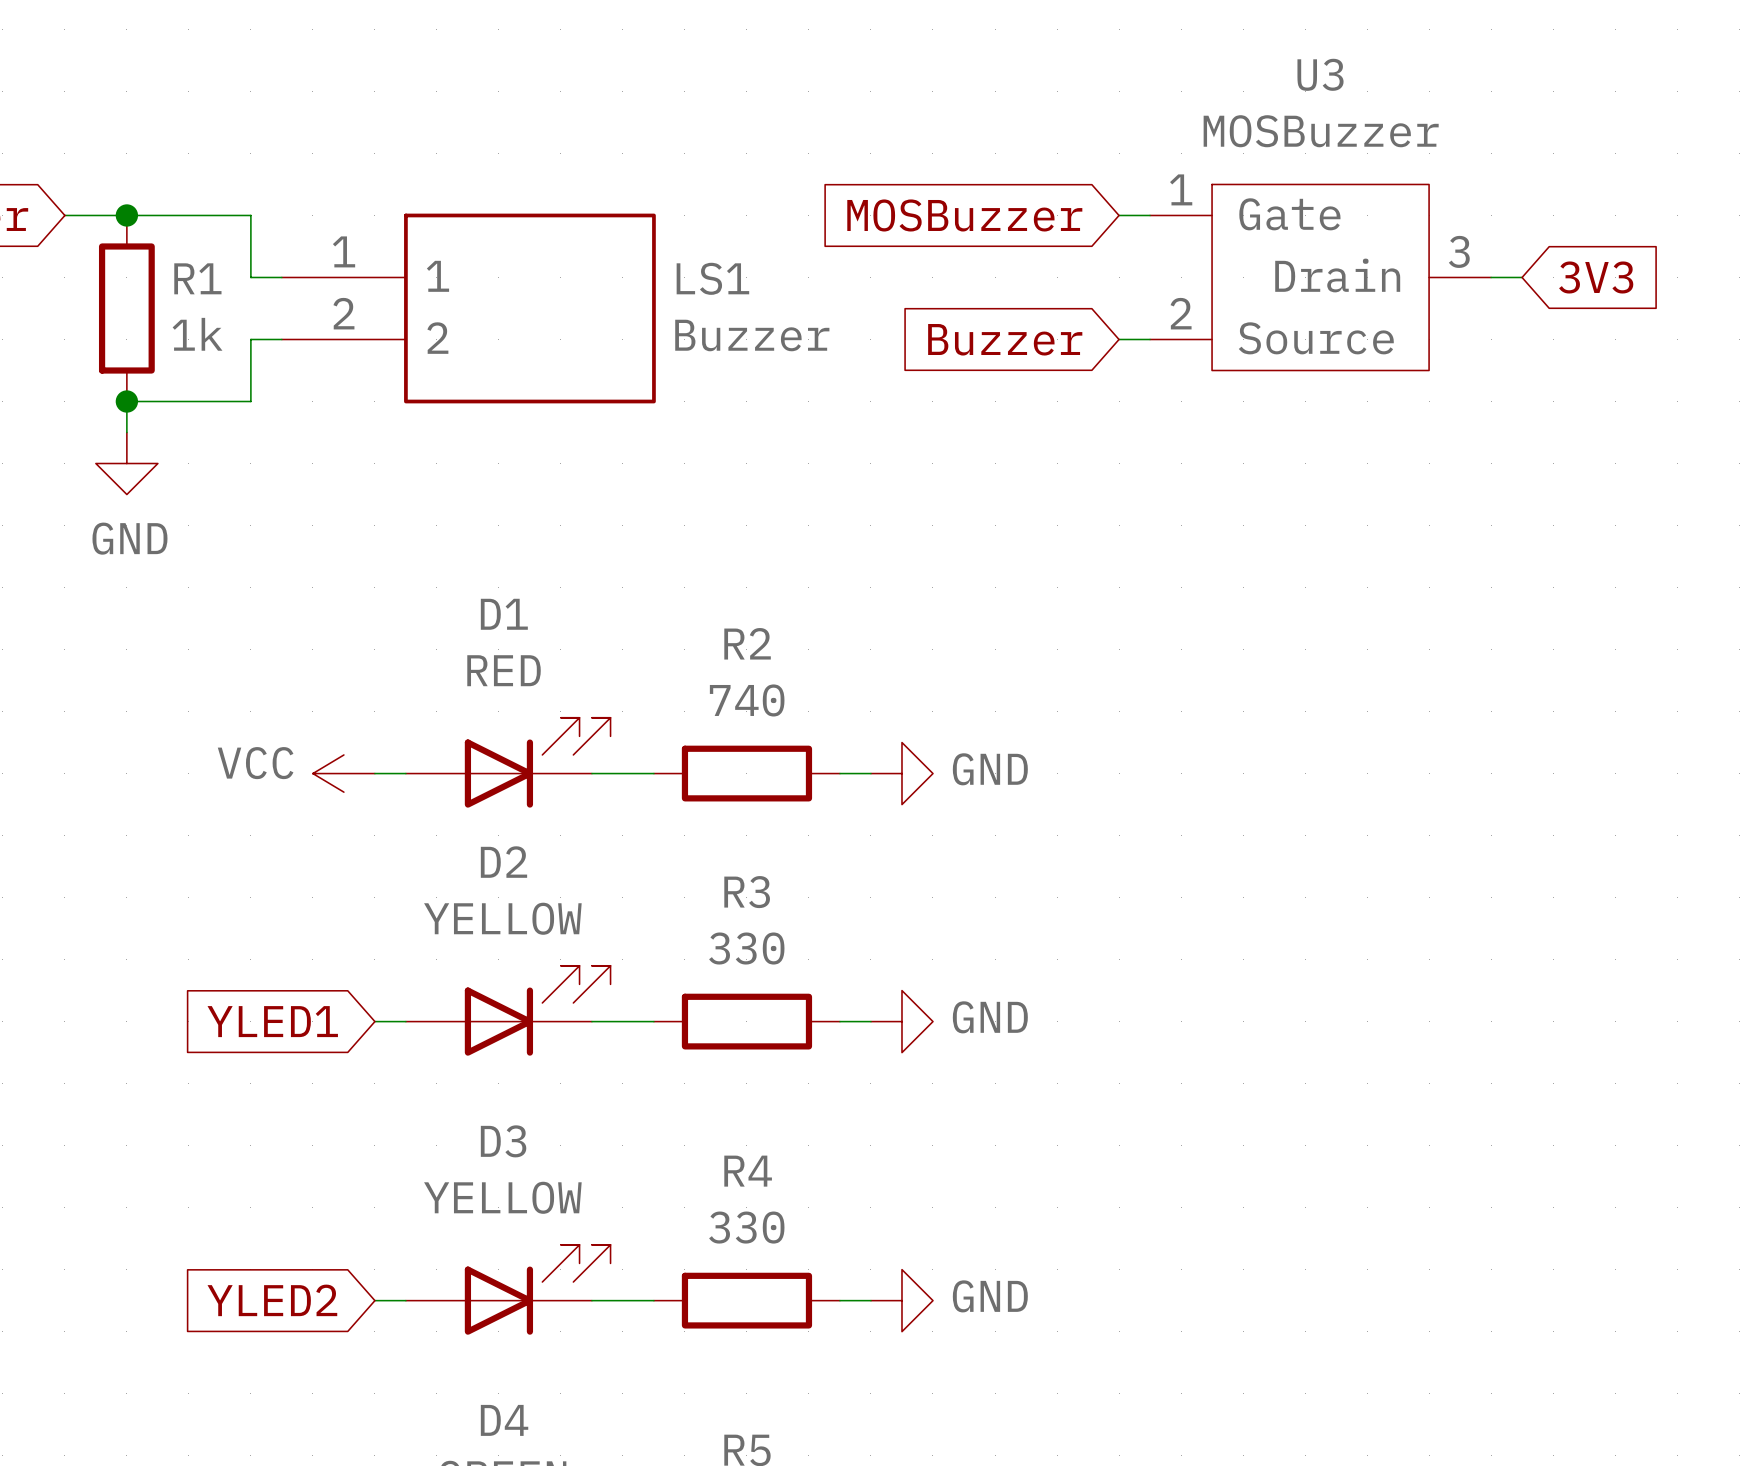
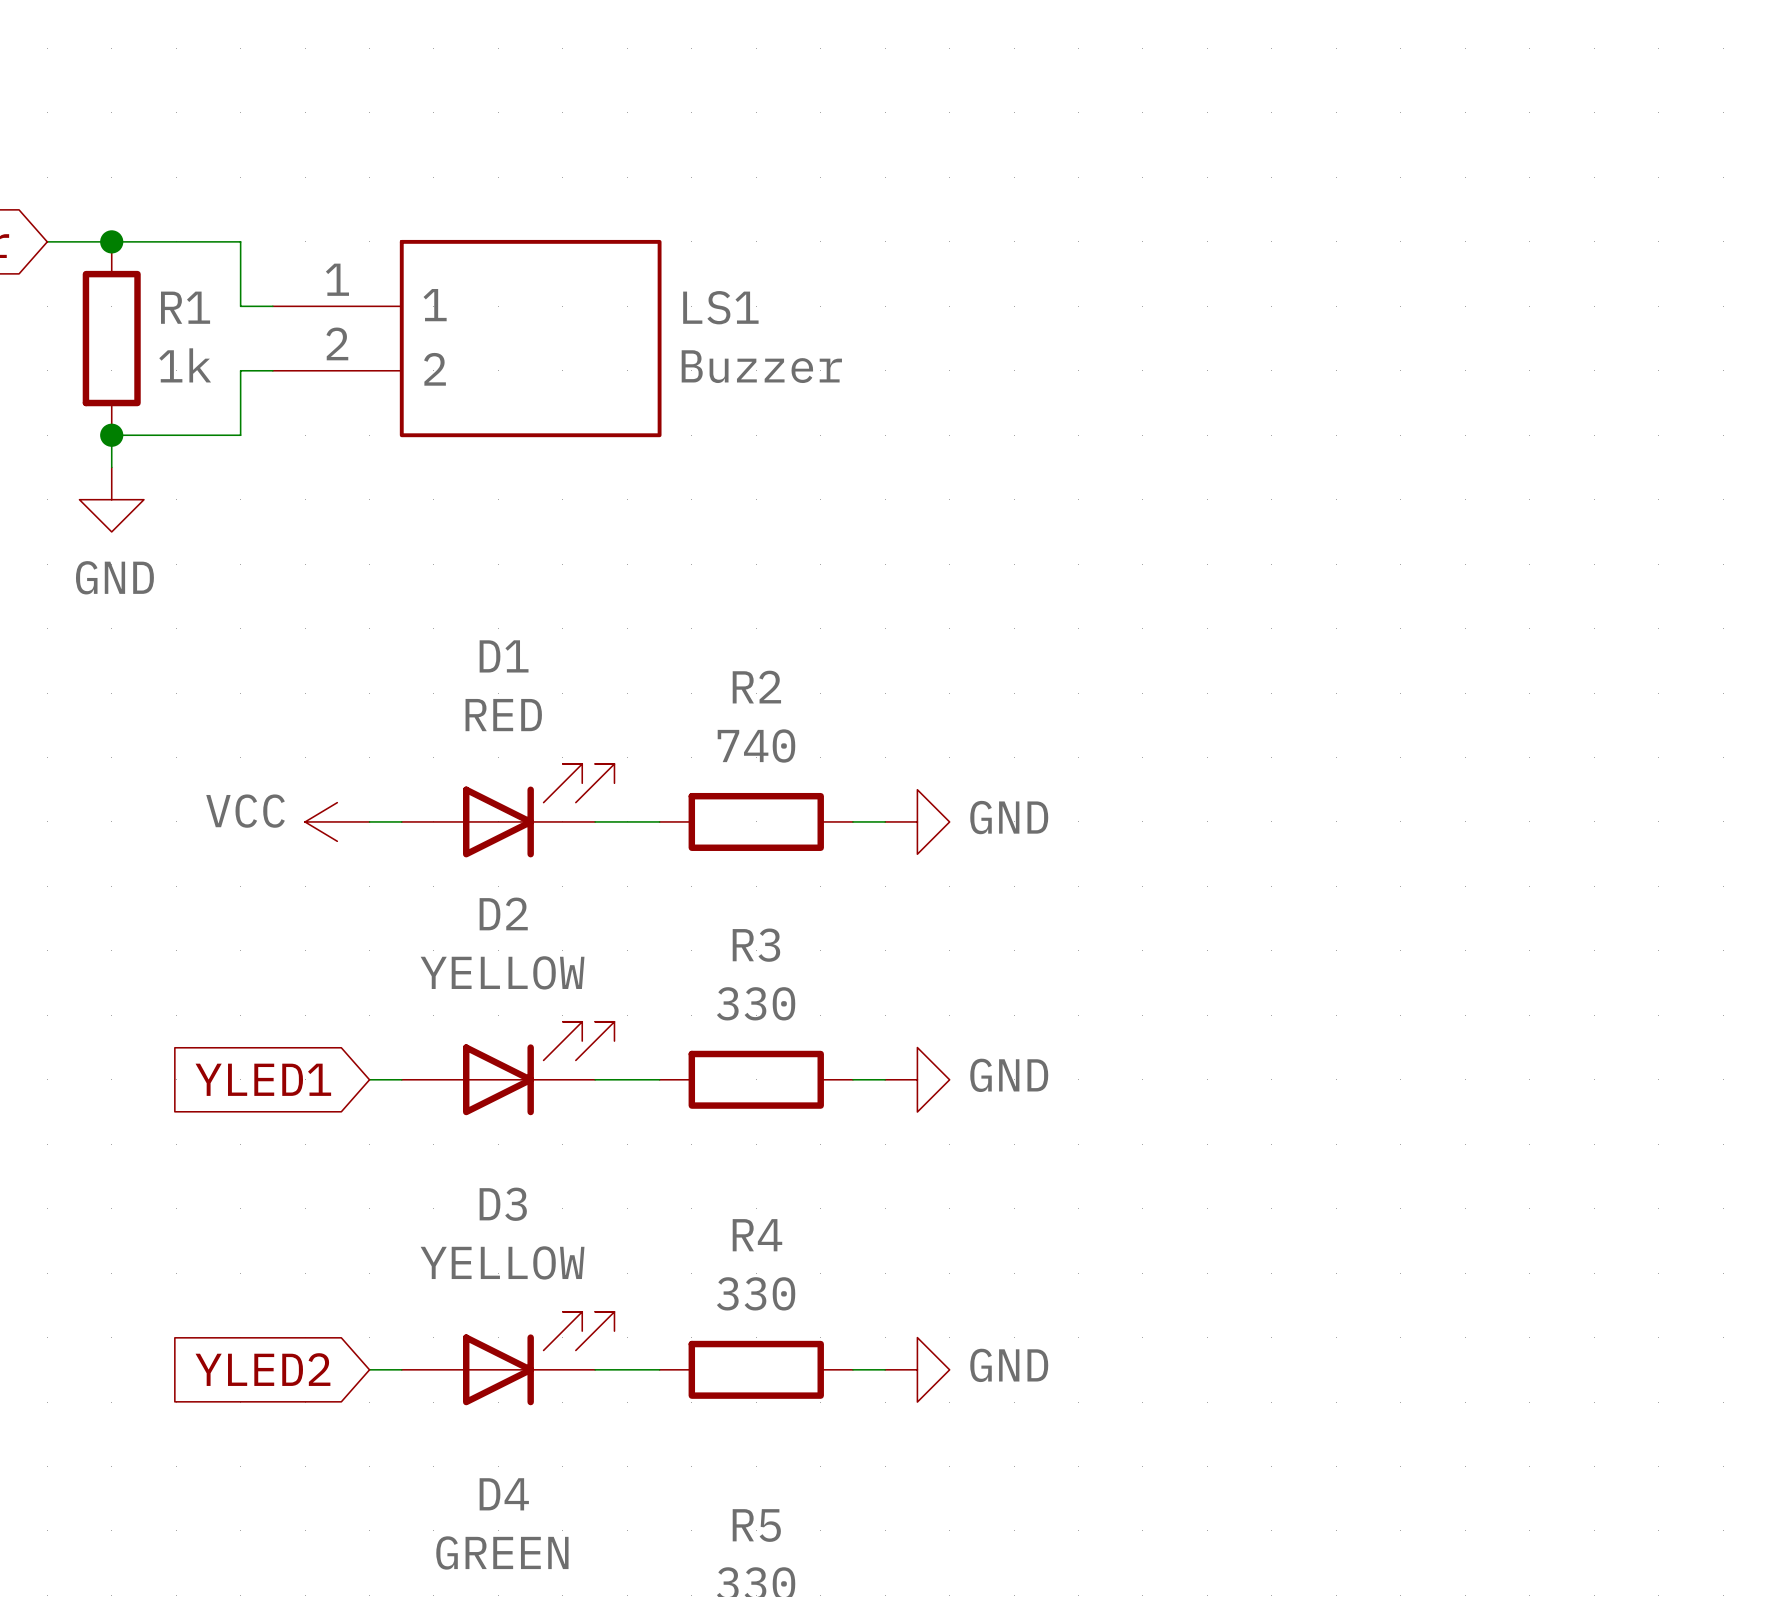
global label: MOSBuzzer (964, 215) -> none
wire: (1119, 215) (1150, 215) -> none
U3: MOSBuzzer (1320, 277) -> none
wire: (1491, 277) (1522, 277) -> none
global label: 3V3 (1596, 277) -> none
global label: Buzzer (1005, 339) -> none
wire: (1119, 339) (1150, 339) -> none

